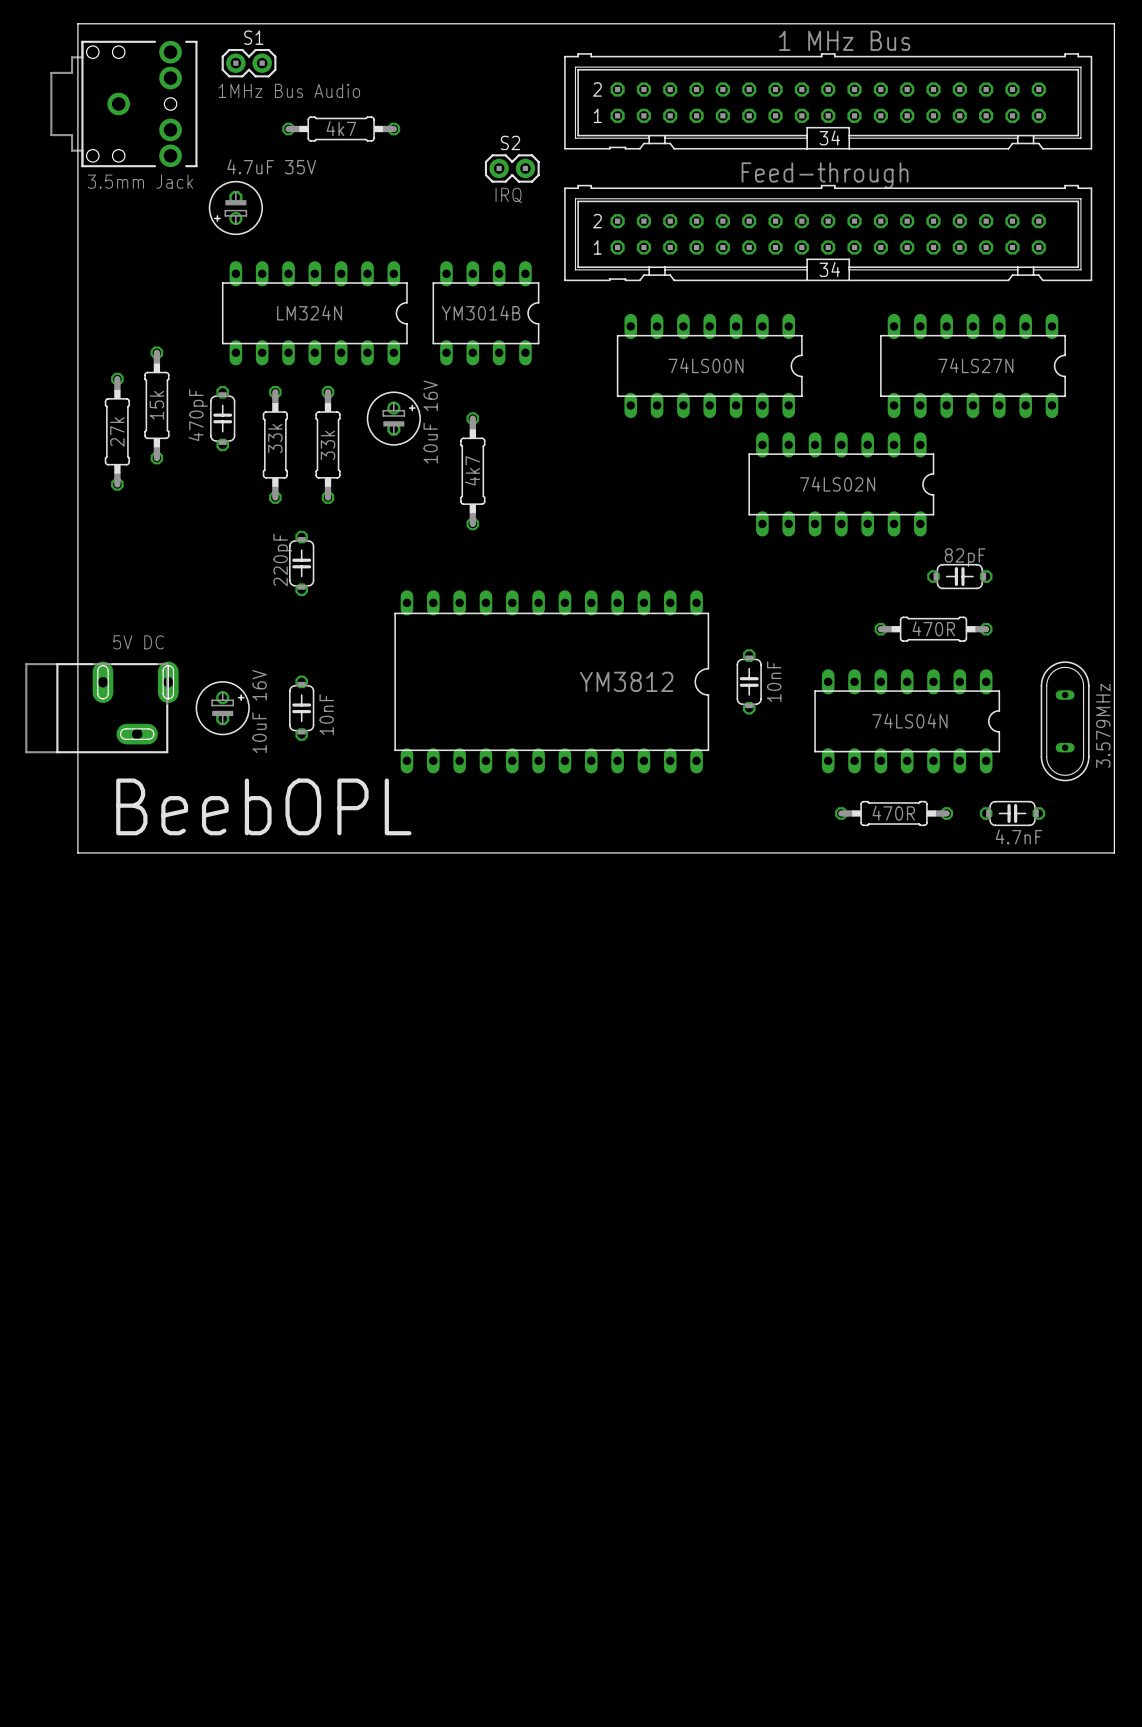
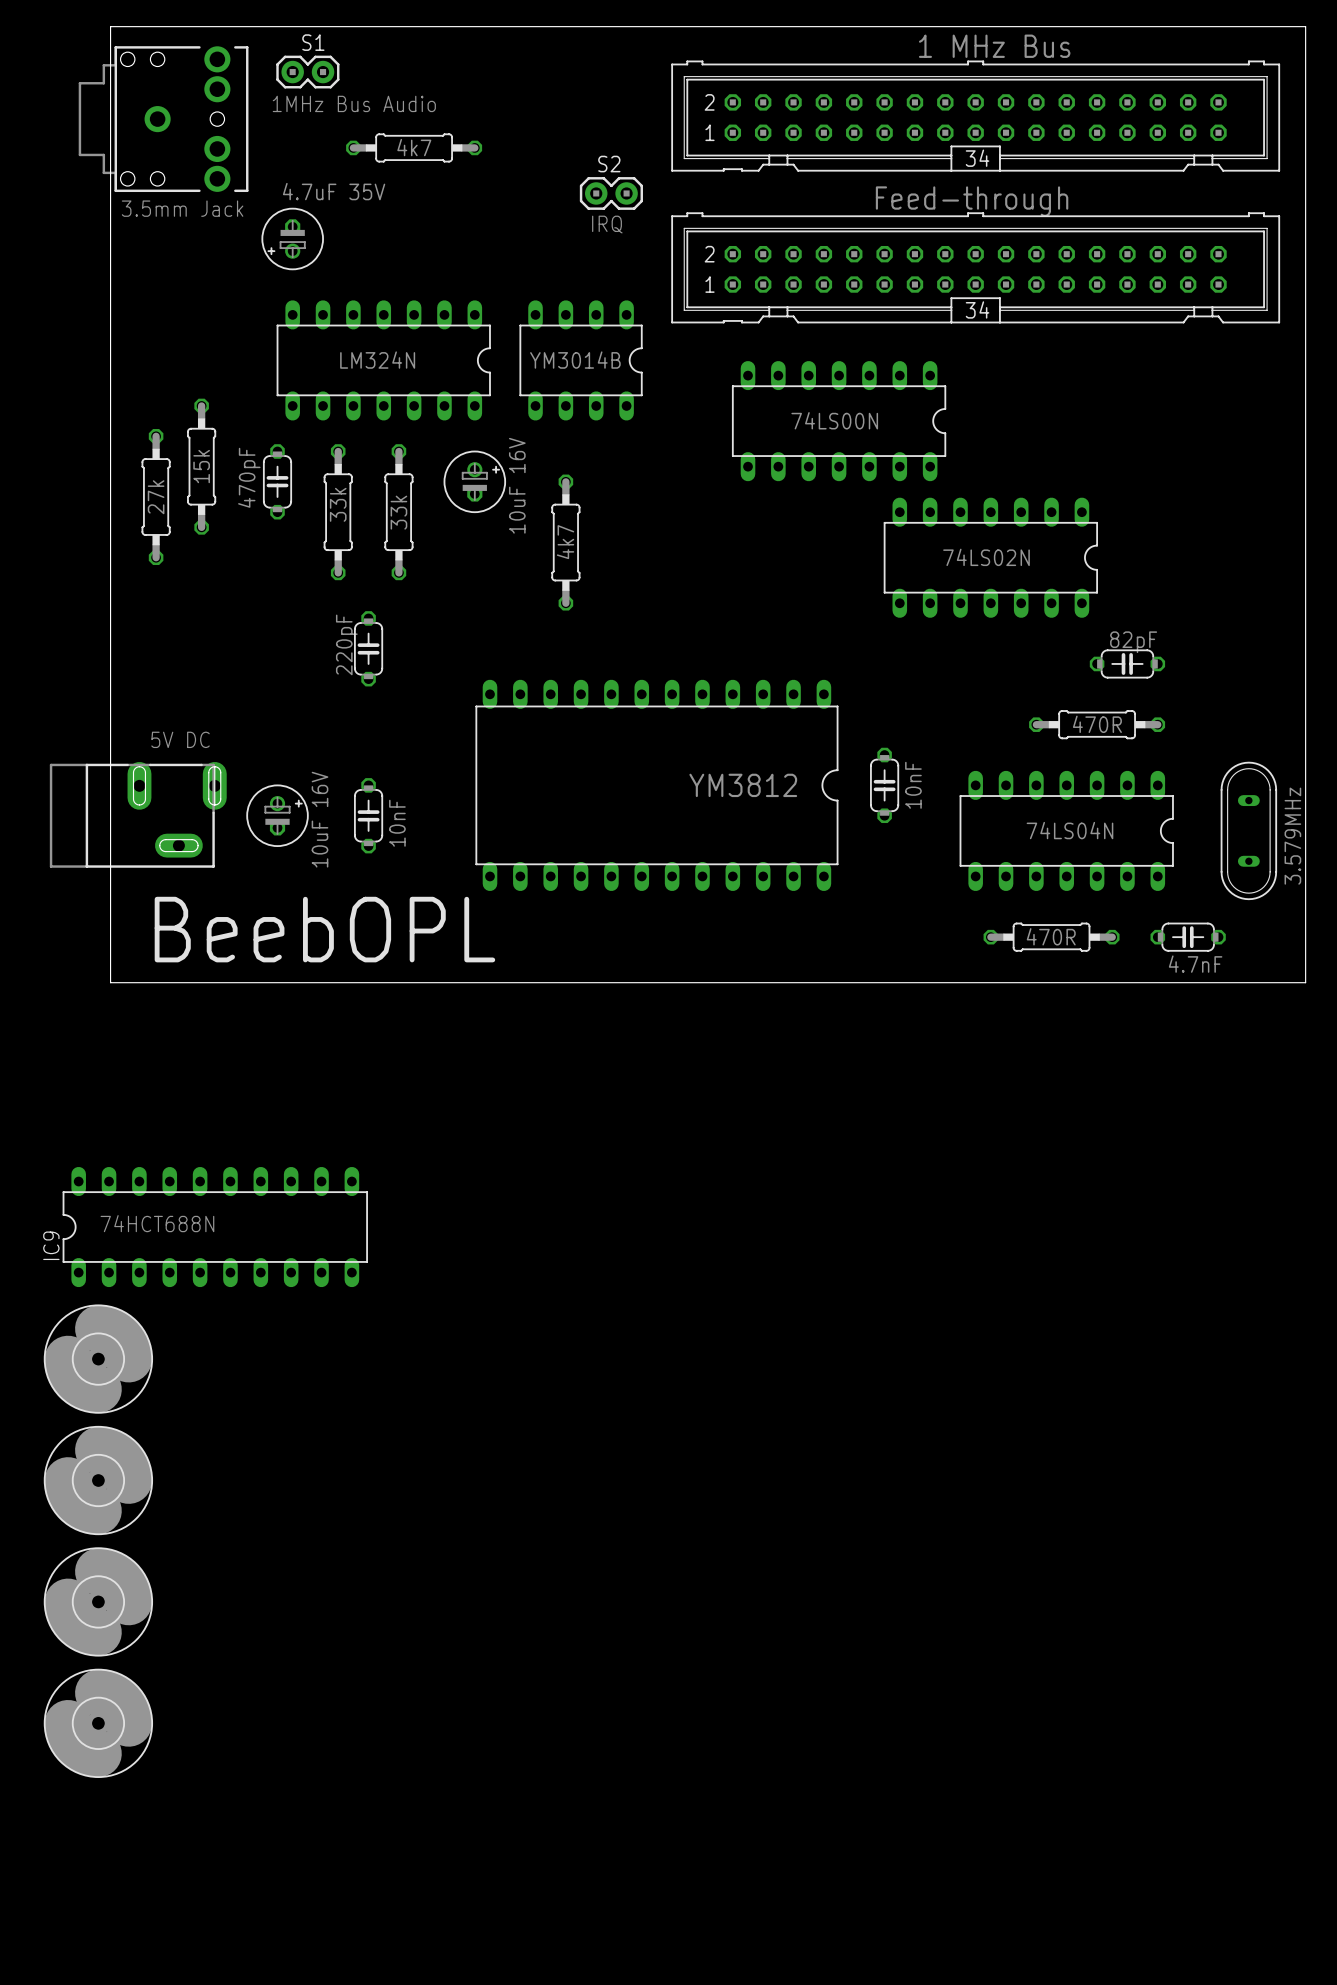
part: 74LS27N (972, 365) -> none
IC9: none -> 74HCT688N (215, 1227)
part: none -> (98, 1359)
part: none -> (98, 1480)
part: none -> (98, 1601)
part: none -> (98, 1723)

